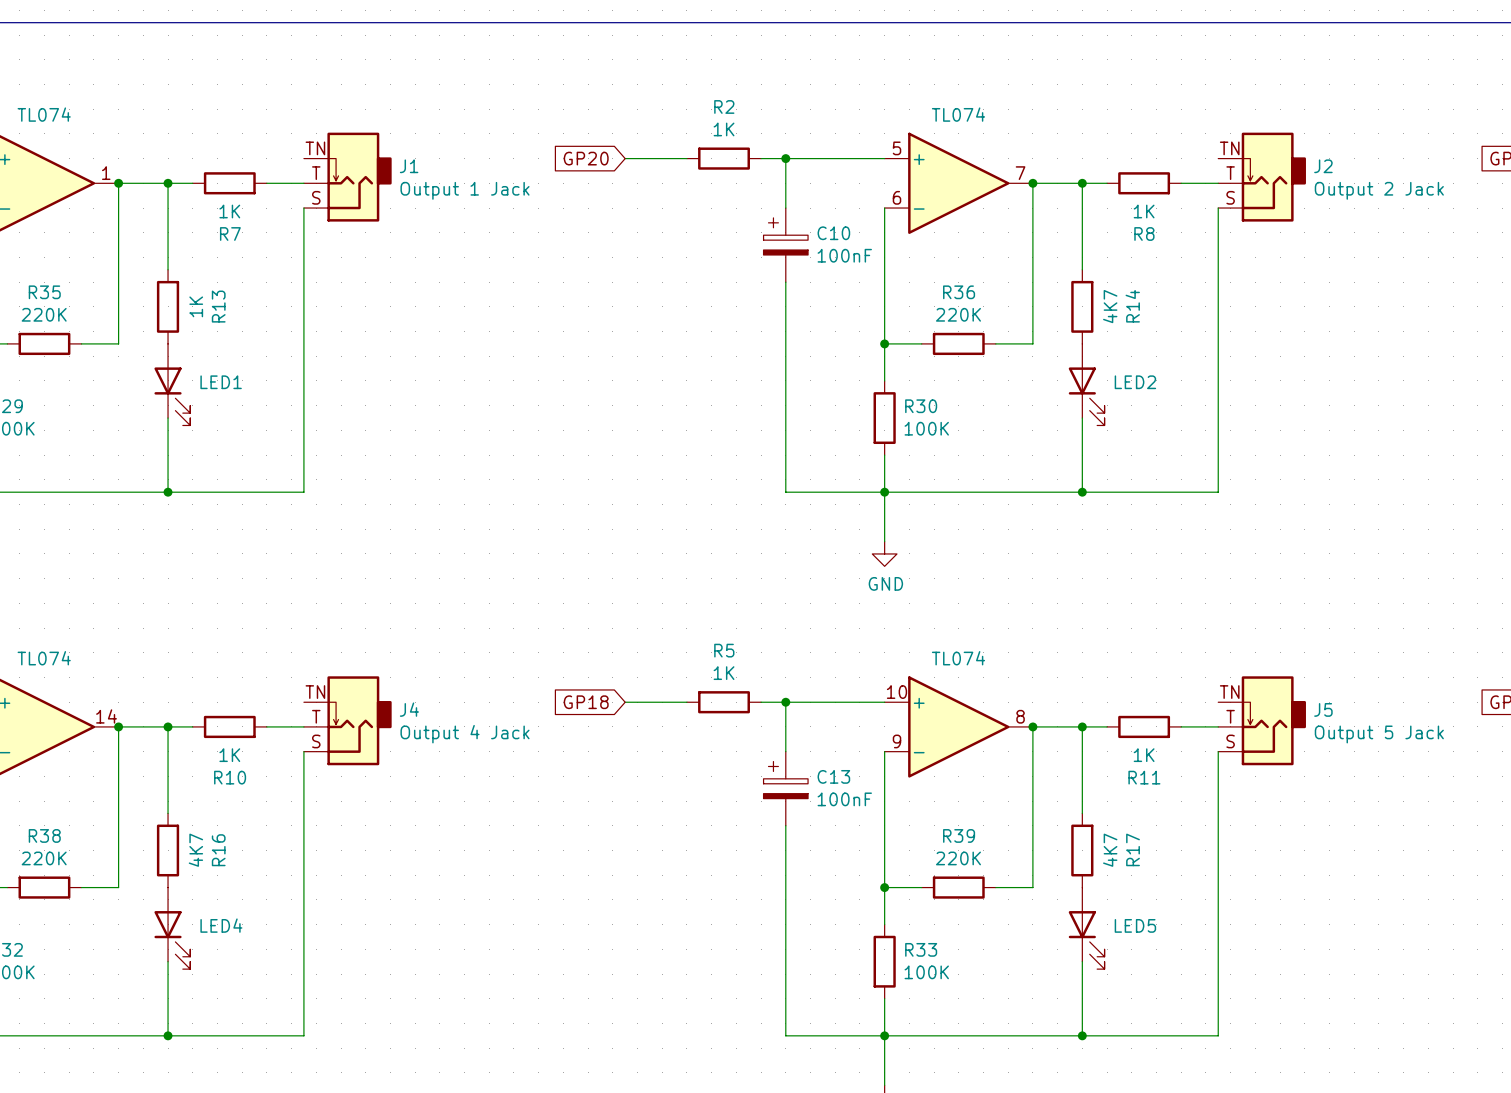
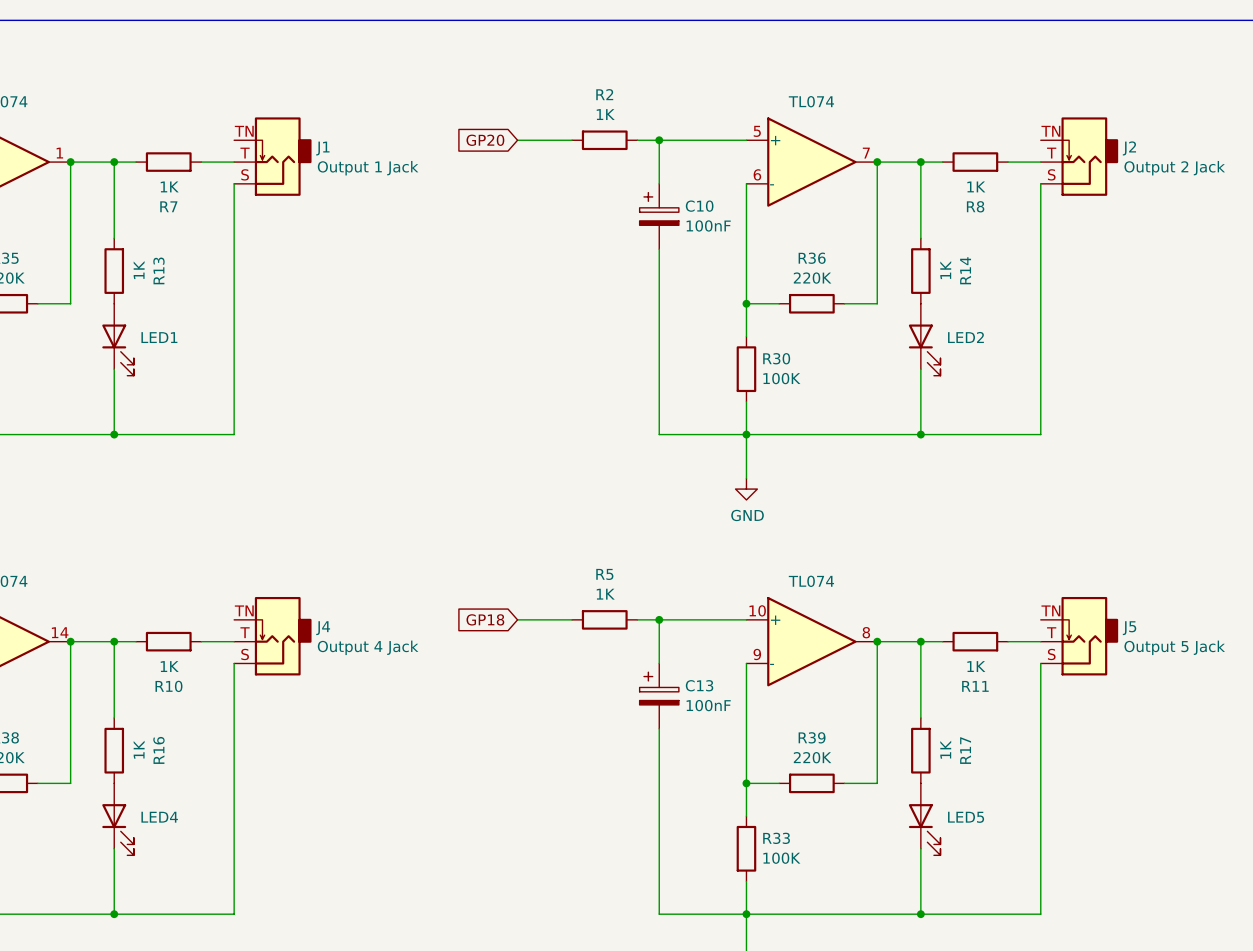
R14 value: 4K7 (1110, 306) -> 1K (945, 270)
R16 value: 4K7 (195, 850) -> 1K (139, 749)
R17 value: 4K7 (1110, 850) -> 1K (945, 749)

